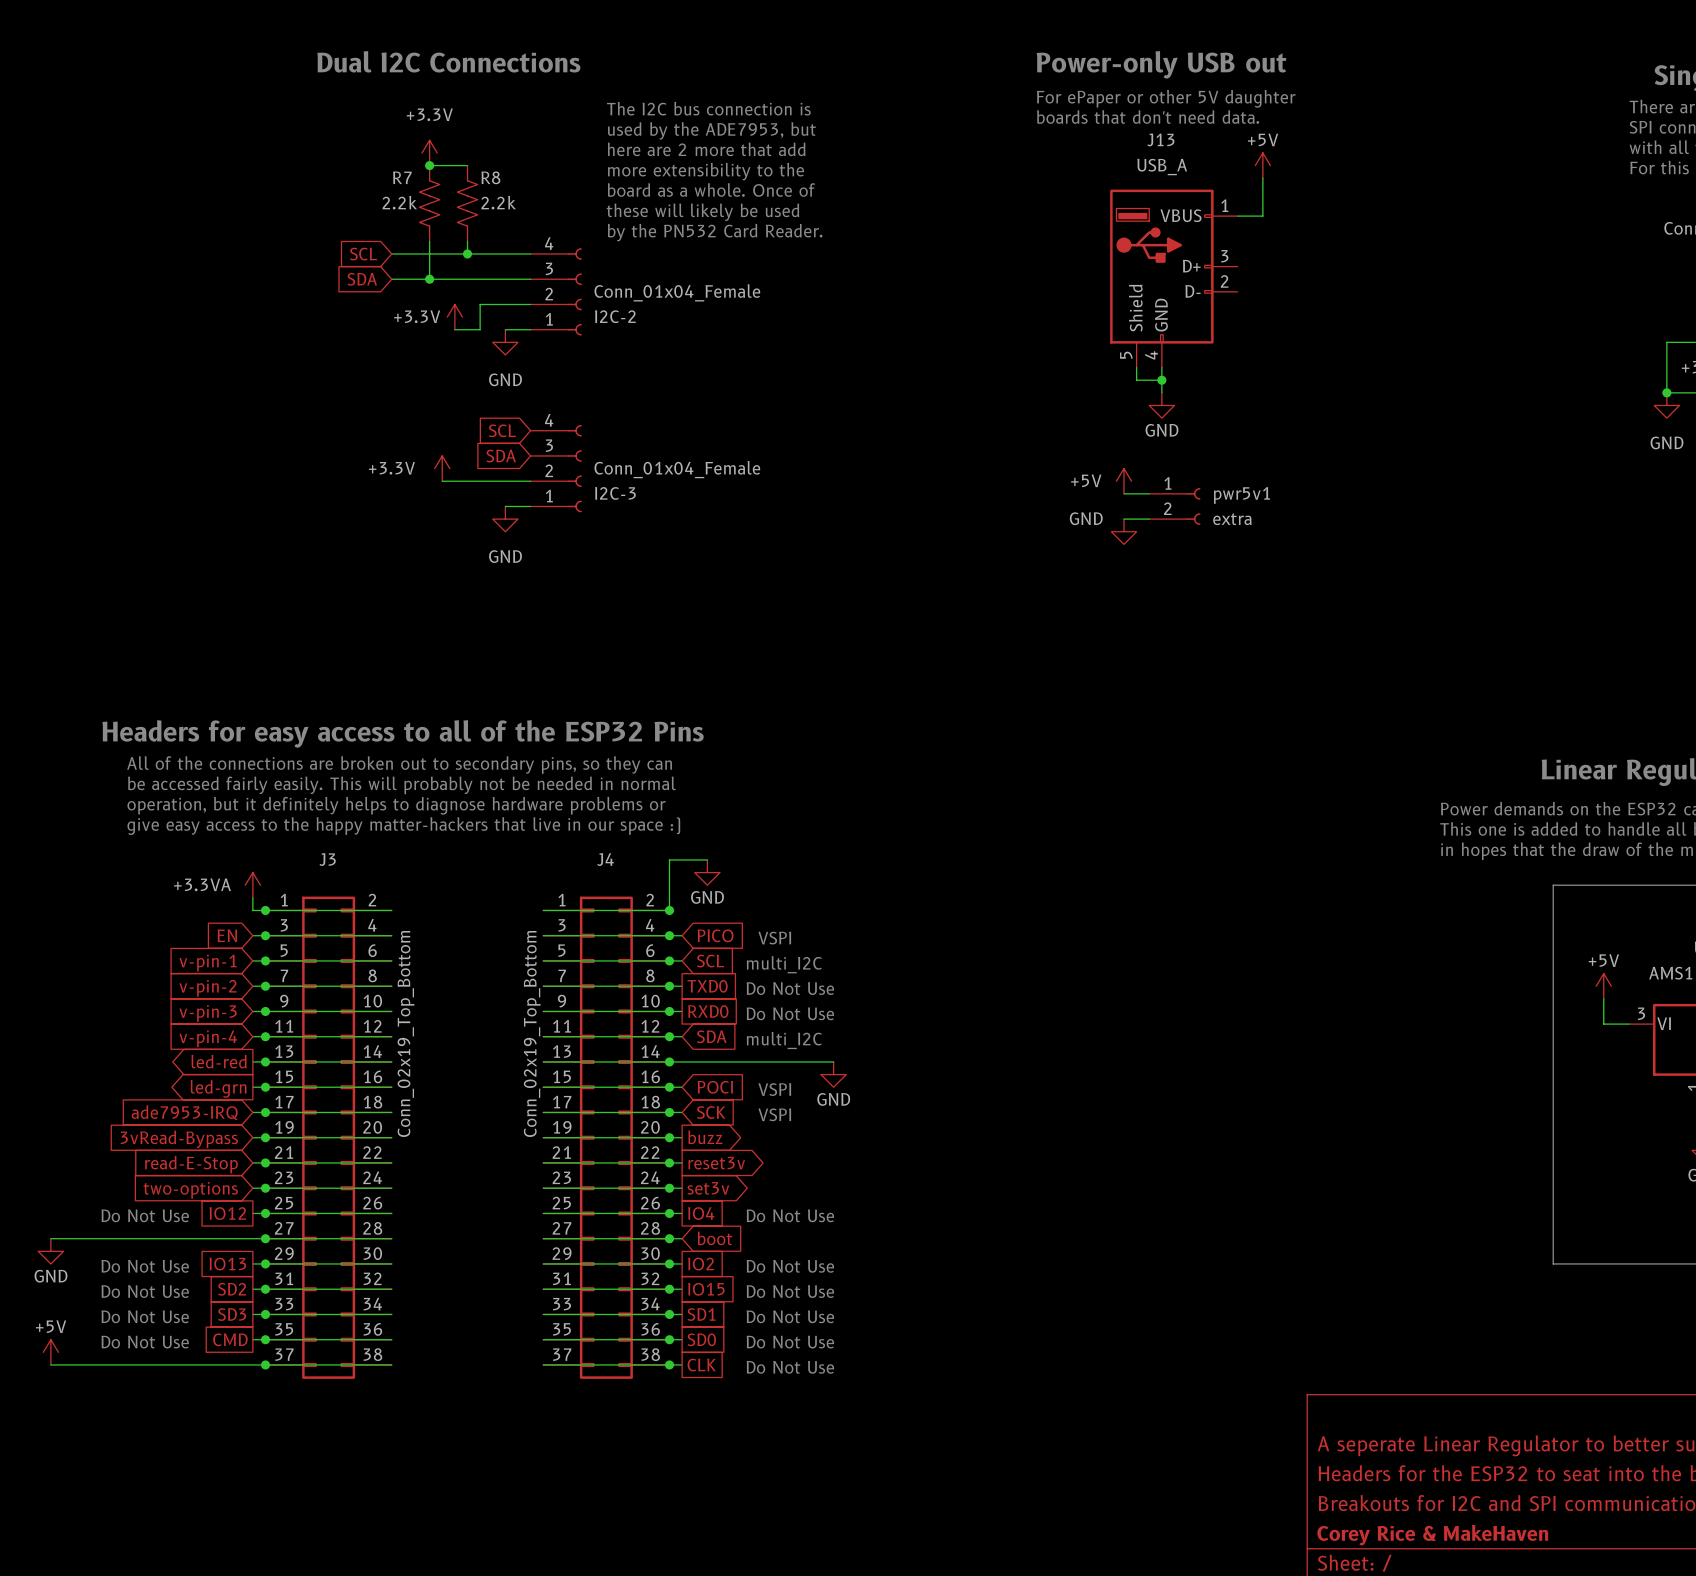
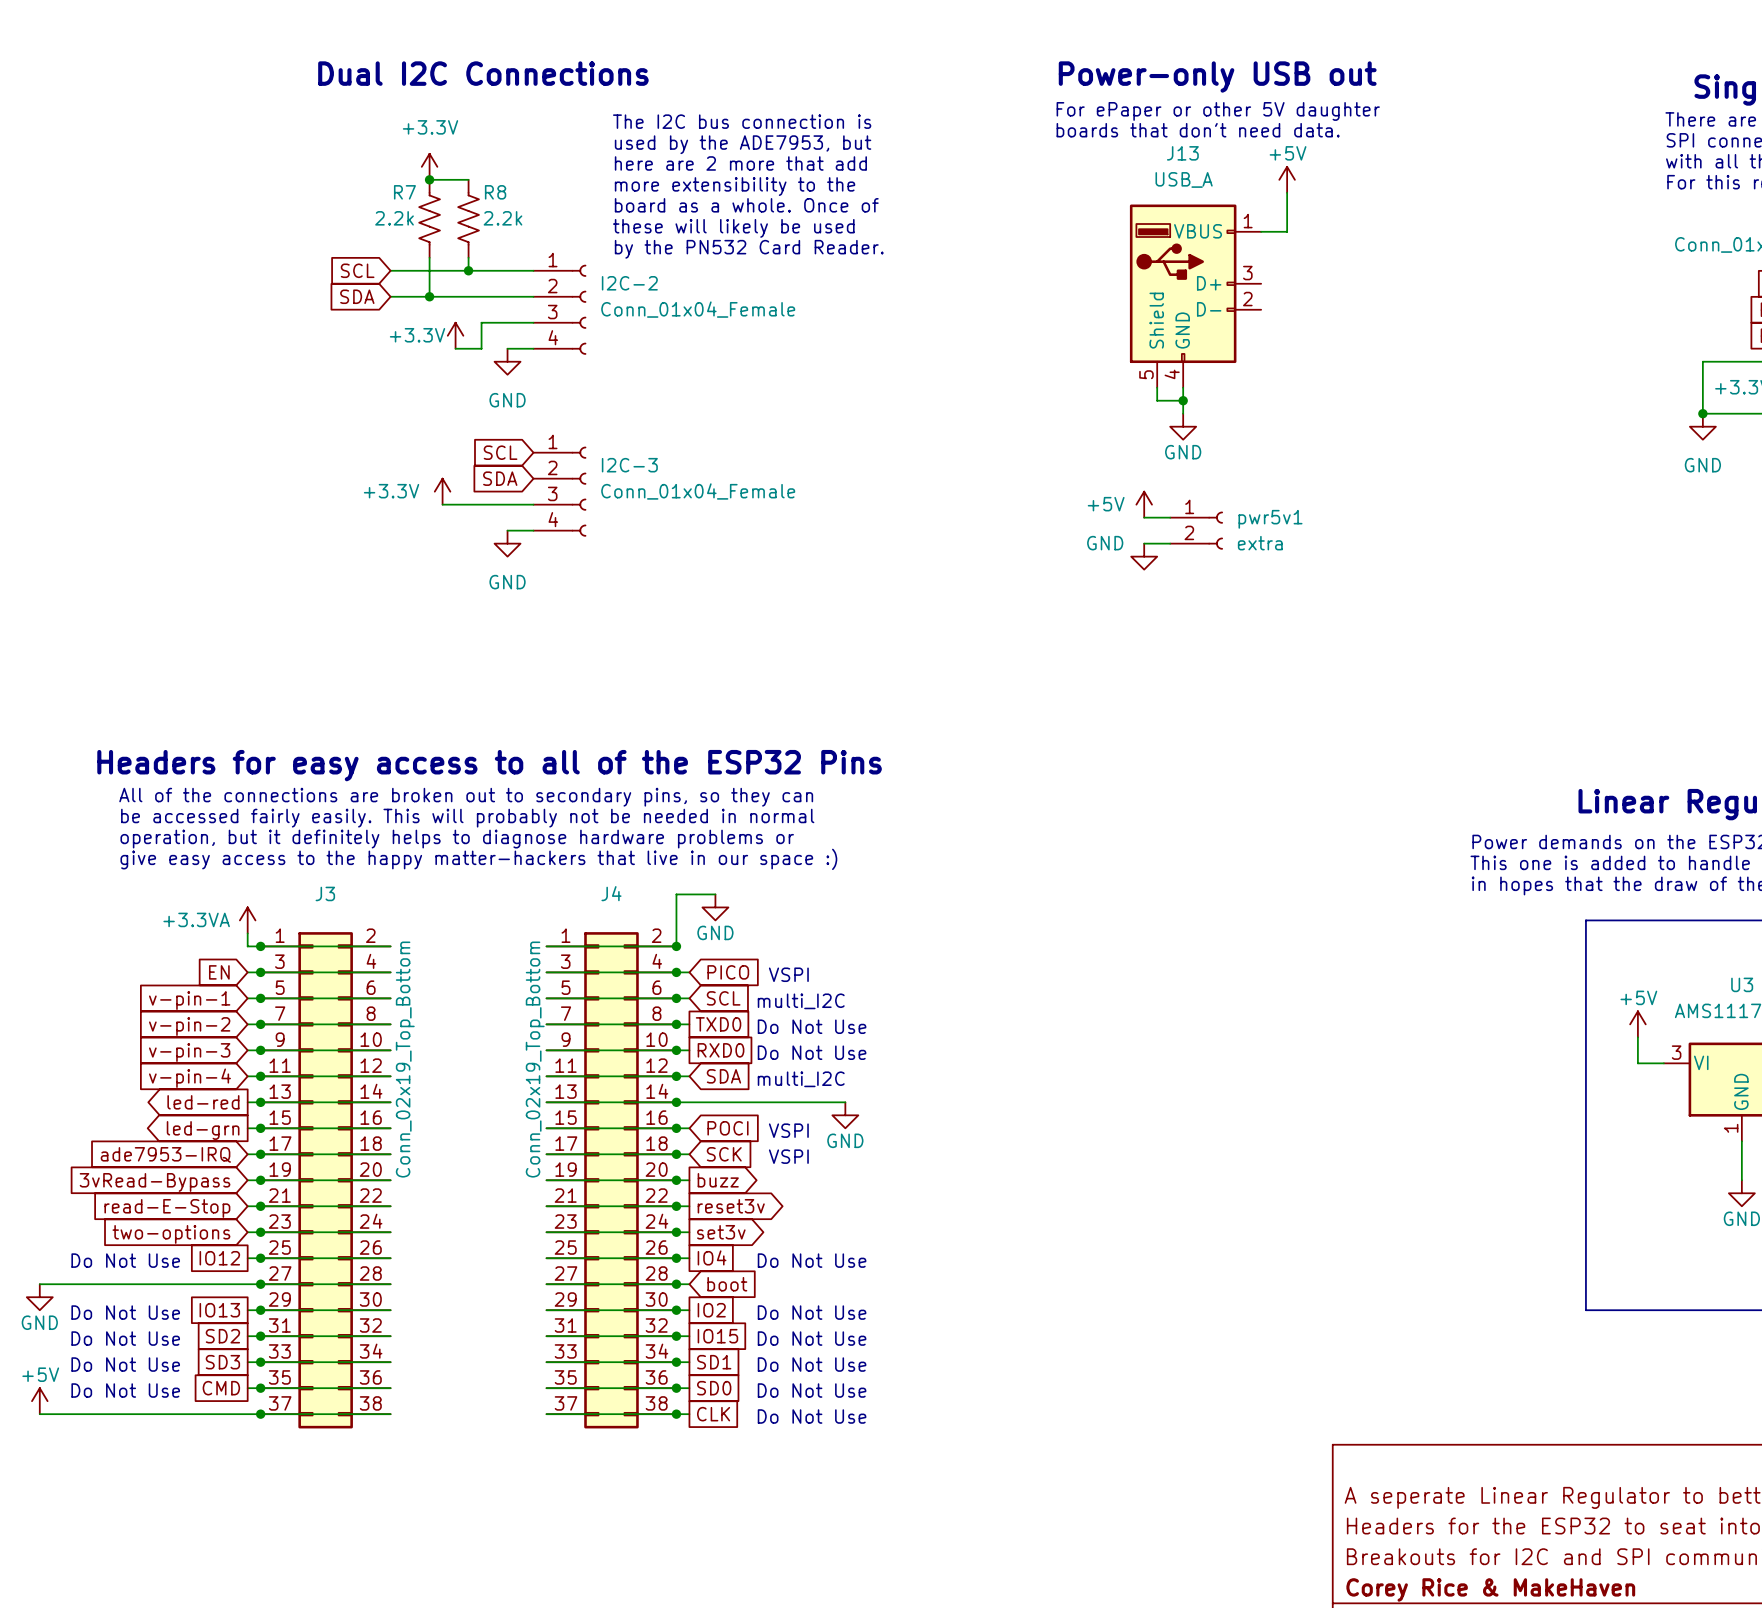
I2C-2 flip: as is (574, 291) -> up-down (579, 309)
I2C-3 flip: as is (574, 468) -> up-down (579, 491)

